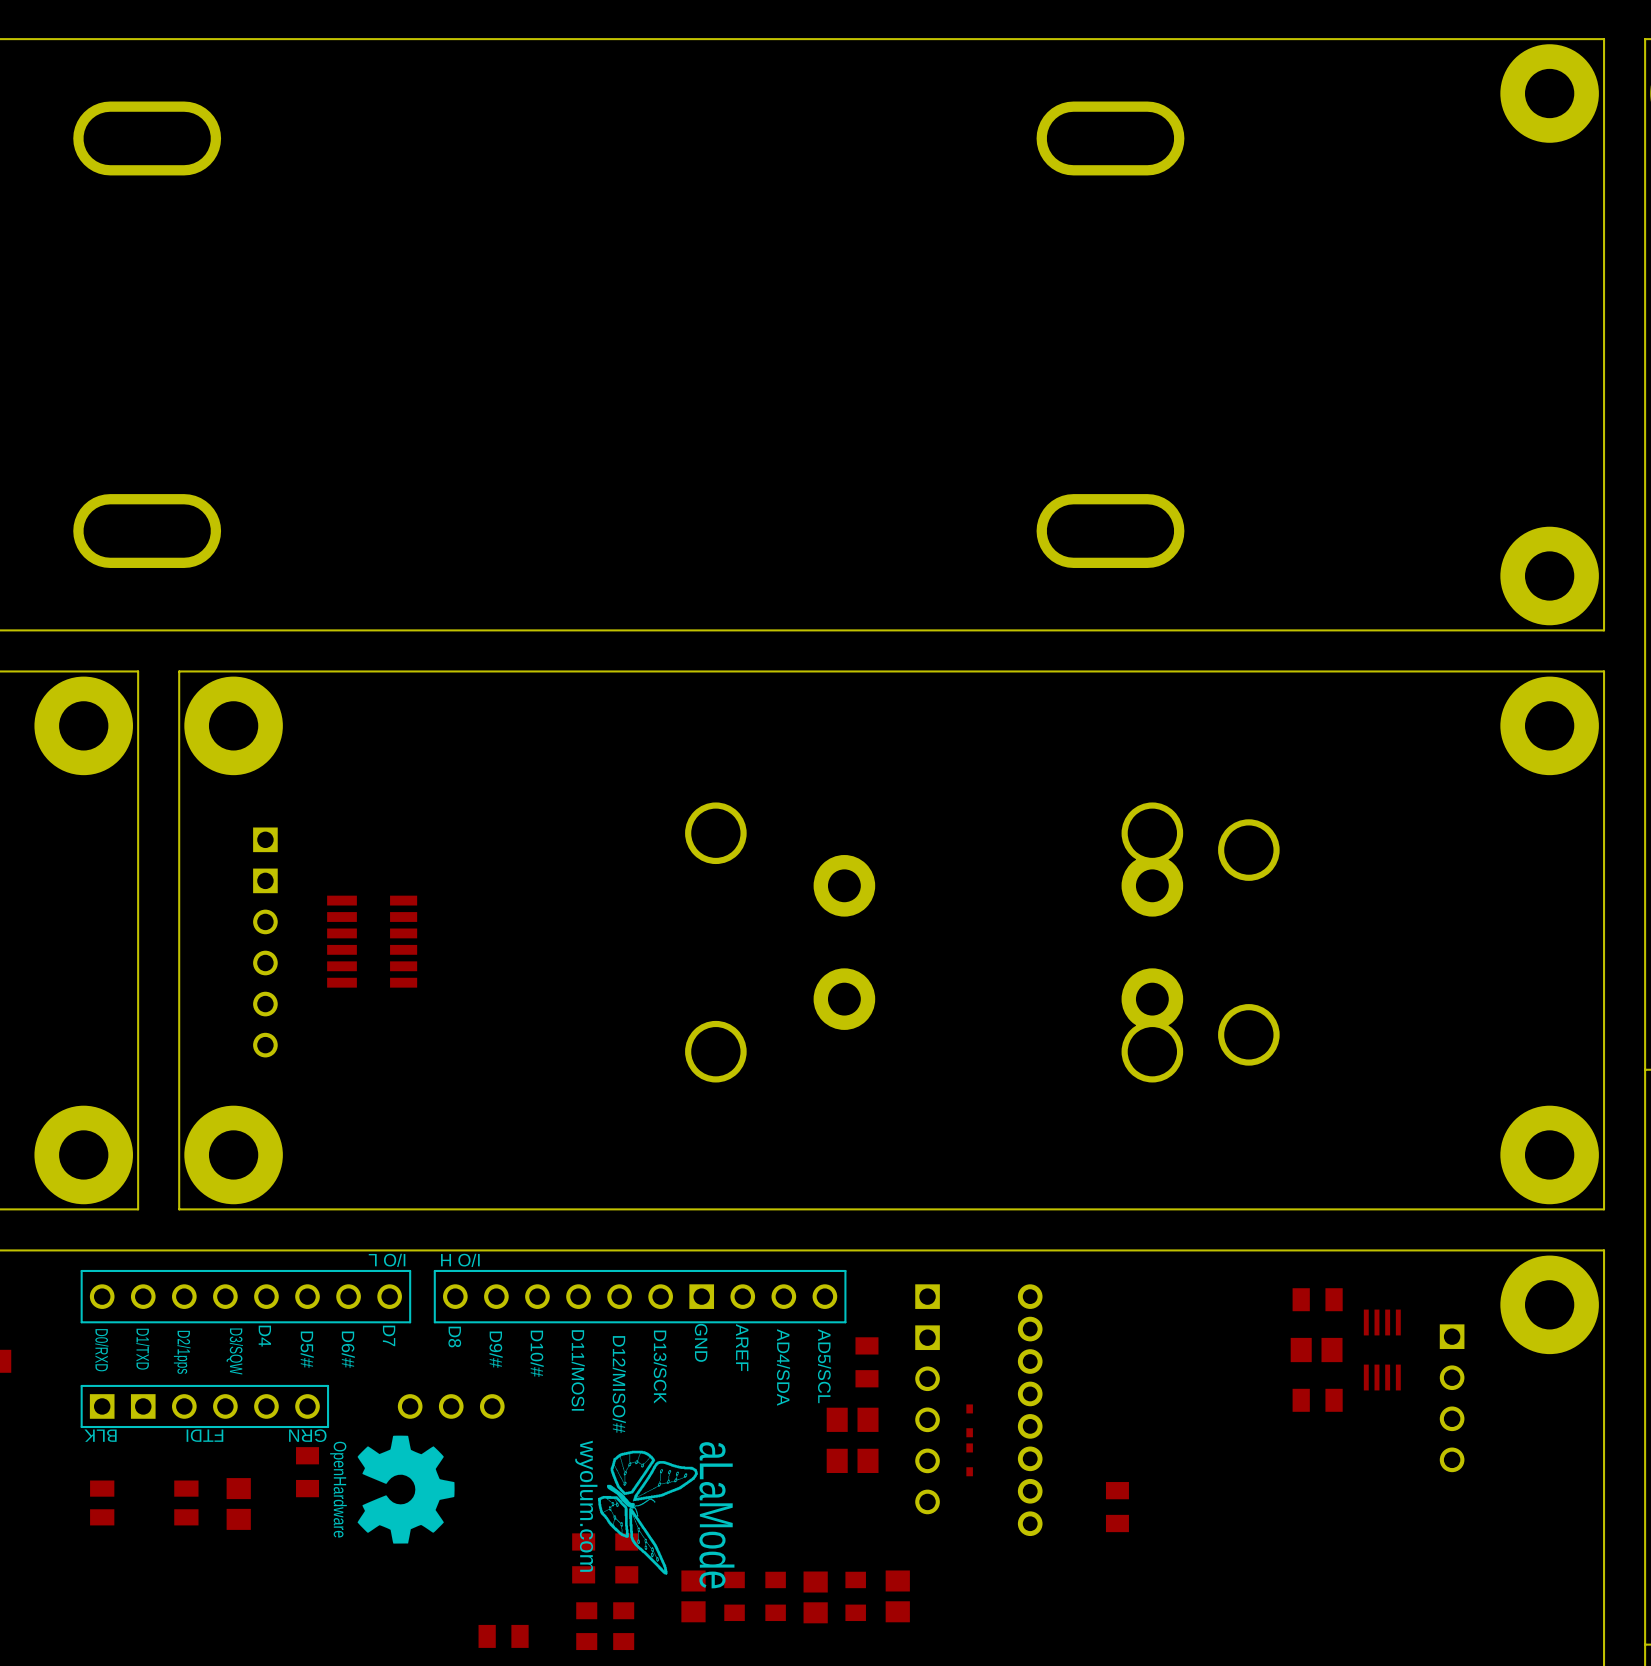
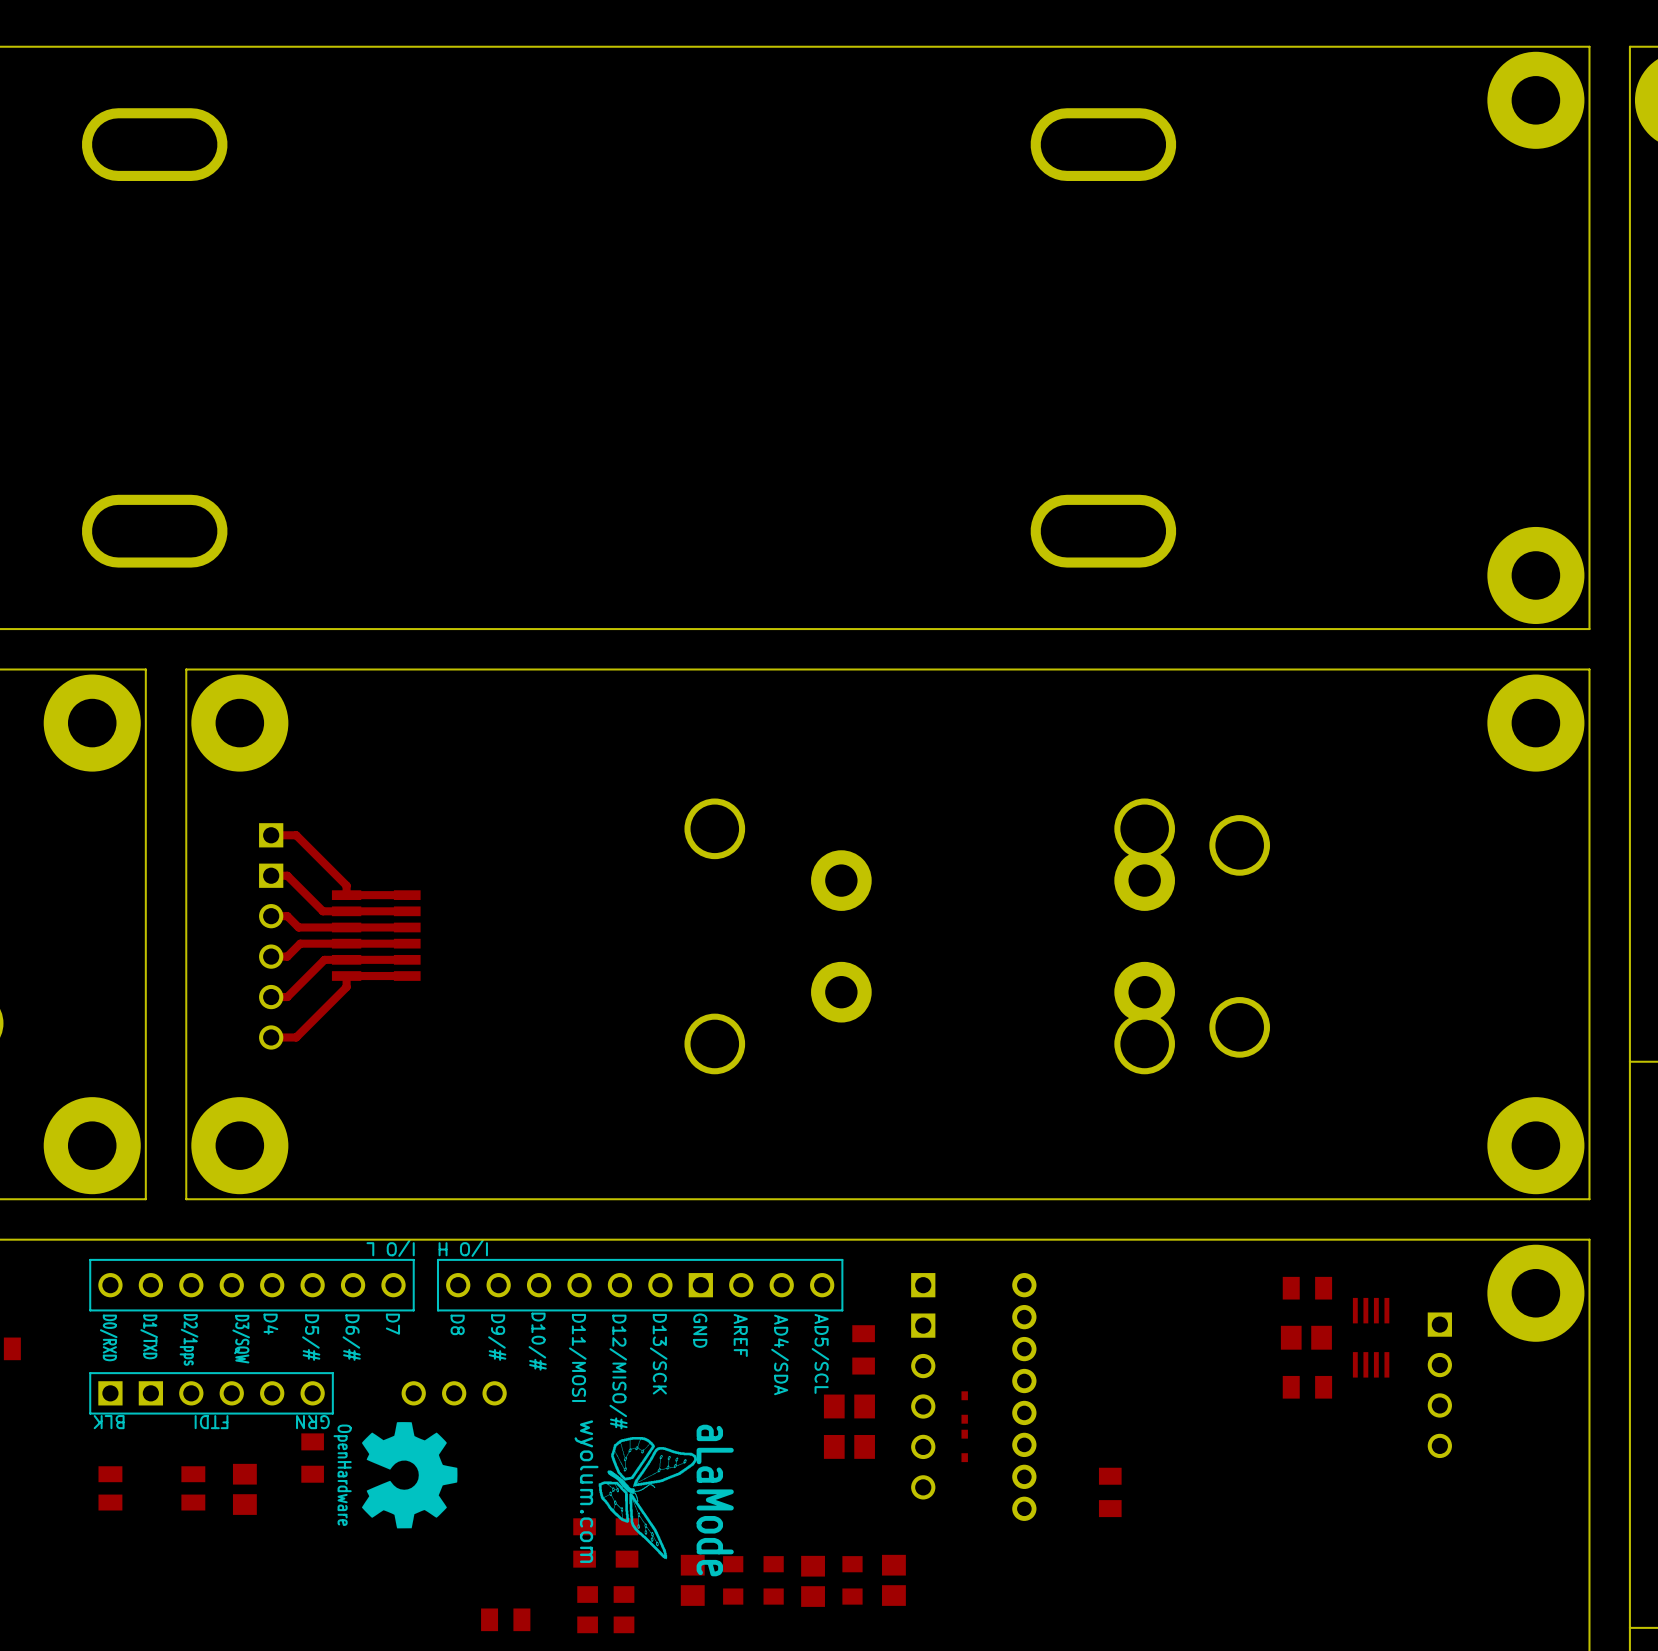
top track: none -> (271, 835) (296, 835) (346, 885) (346, 895) (407, 895)
top track: none -> (271, 875) (287, 875) (322, 911) (407, 911)
top track: none -> (271, 916) (287, 916) (298, 927) (407, 927)
top track: none -> (407, 943) (300, 943) (287, 956) (271, 956)
top track: none -> (407, 959) (324, 959) (287, 997) (271, 997)
top track: none -> (407, 976) (346, 976) (346, 987) (296, 1037) (271, 1037)

